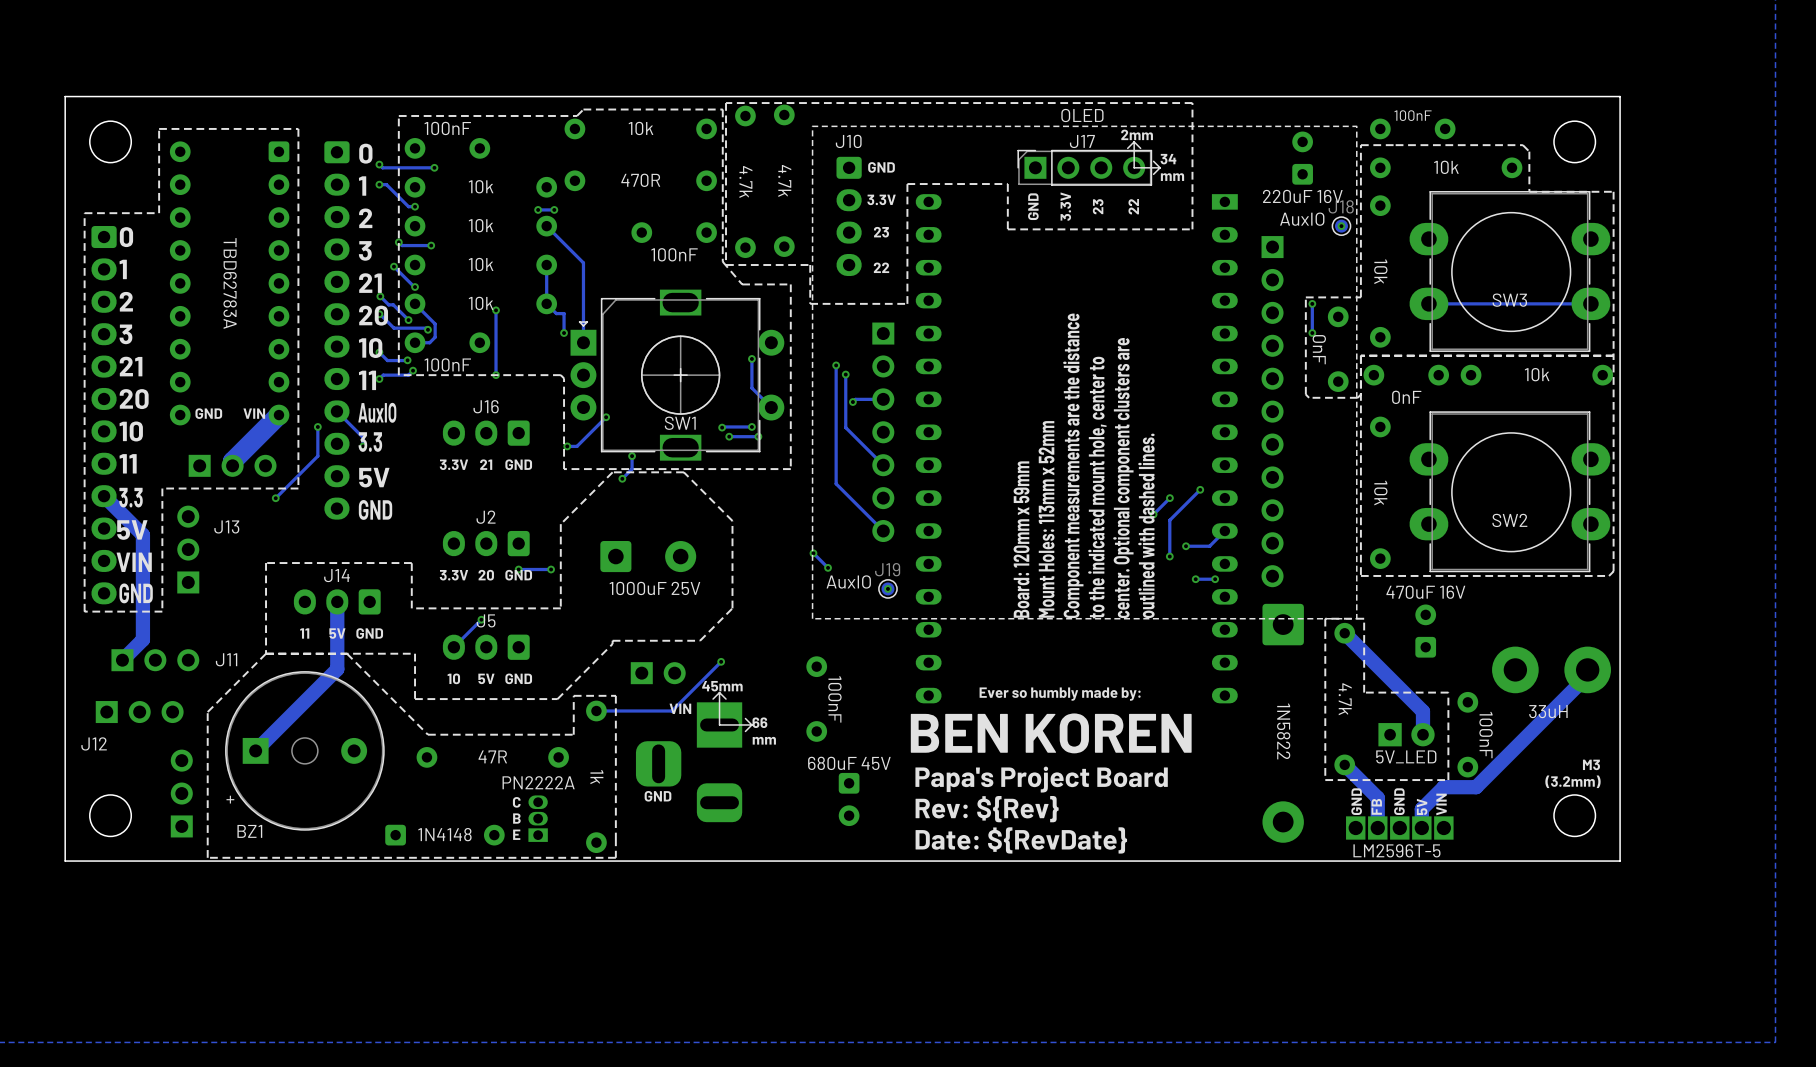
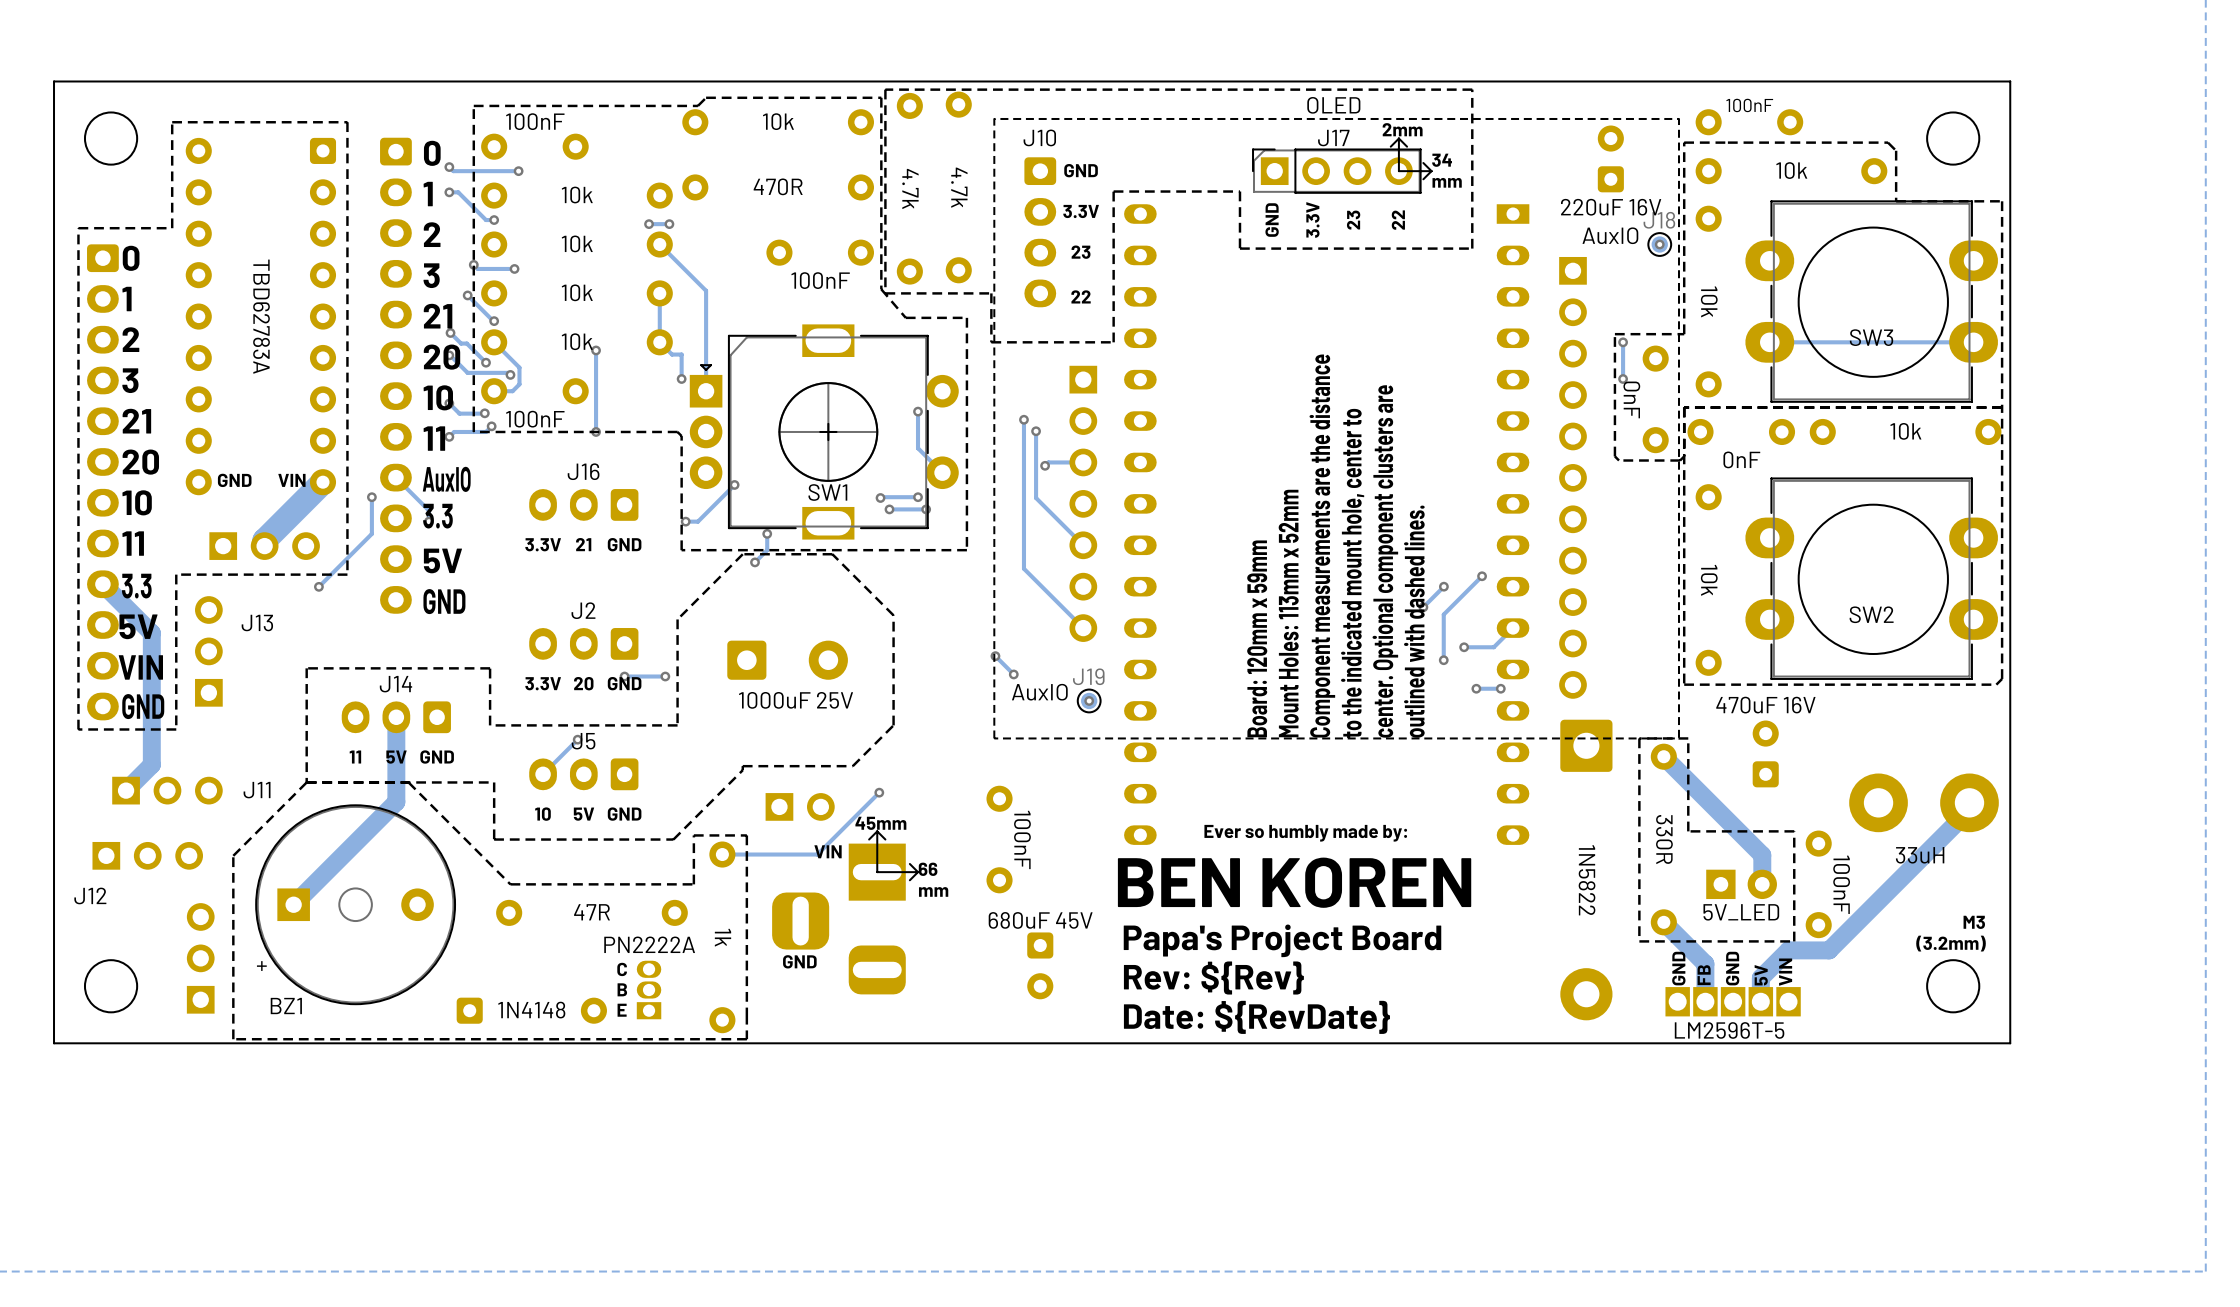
part value: 4.7k (1345, 699) -> 330R (1664, 839)

